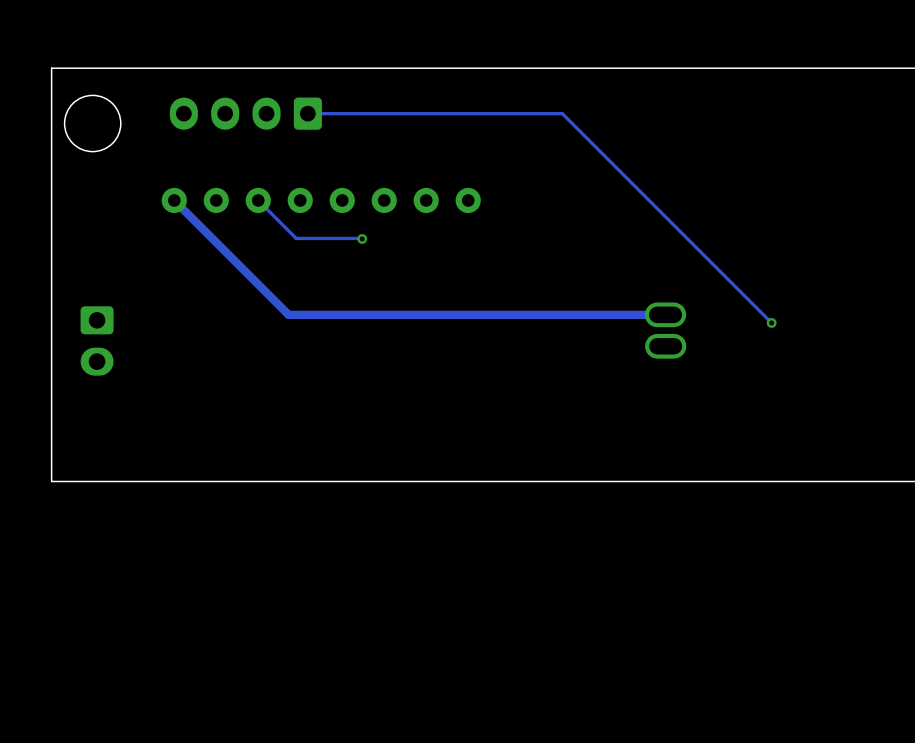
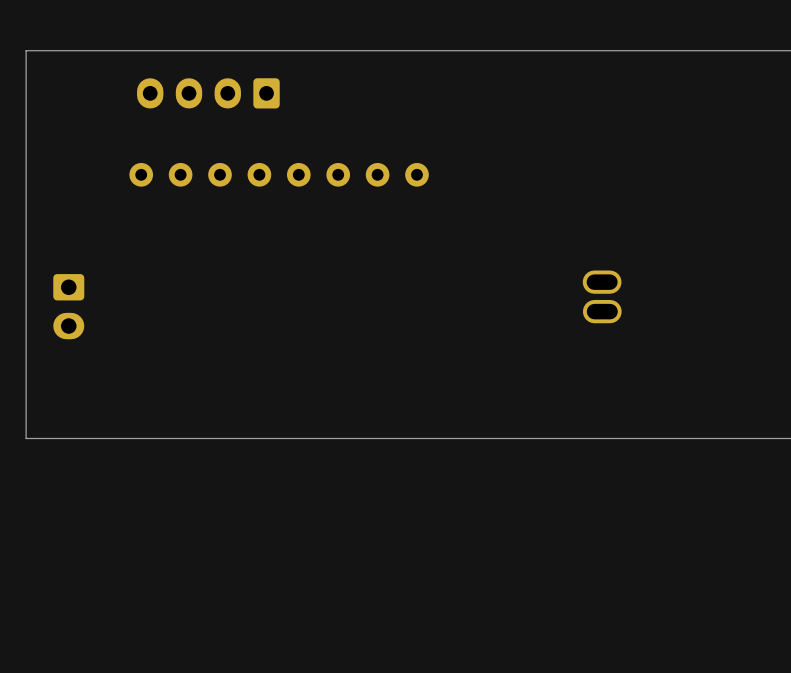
round board edge: [64, 94, 122, 153] -> none
track: (307, 113) (562, 113) (771, 322) -> none
track: (174, 200) (288, 314) (665, 314) -> none
track: (258, 200) (296, 238) (362, 238) -> none
via: (362, 238) -> none
via: (771, 322) -> none

